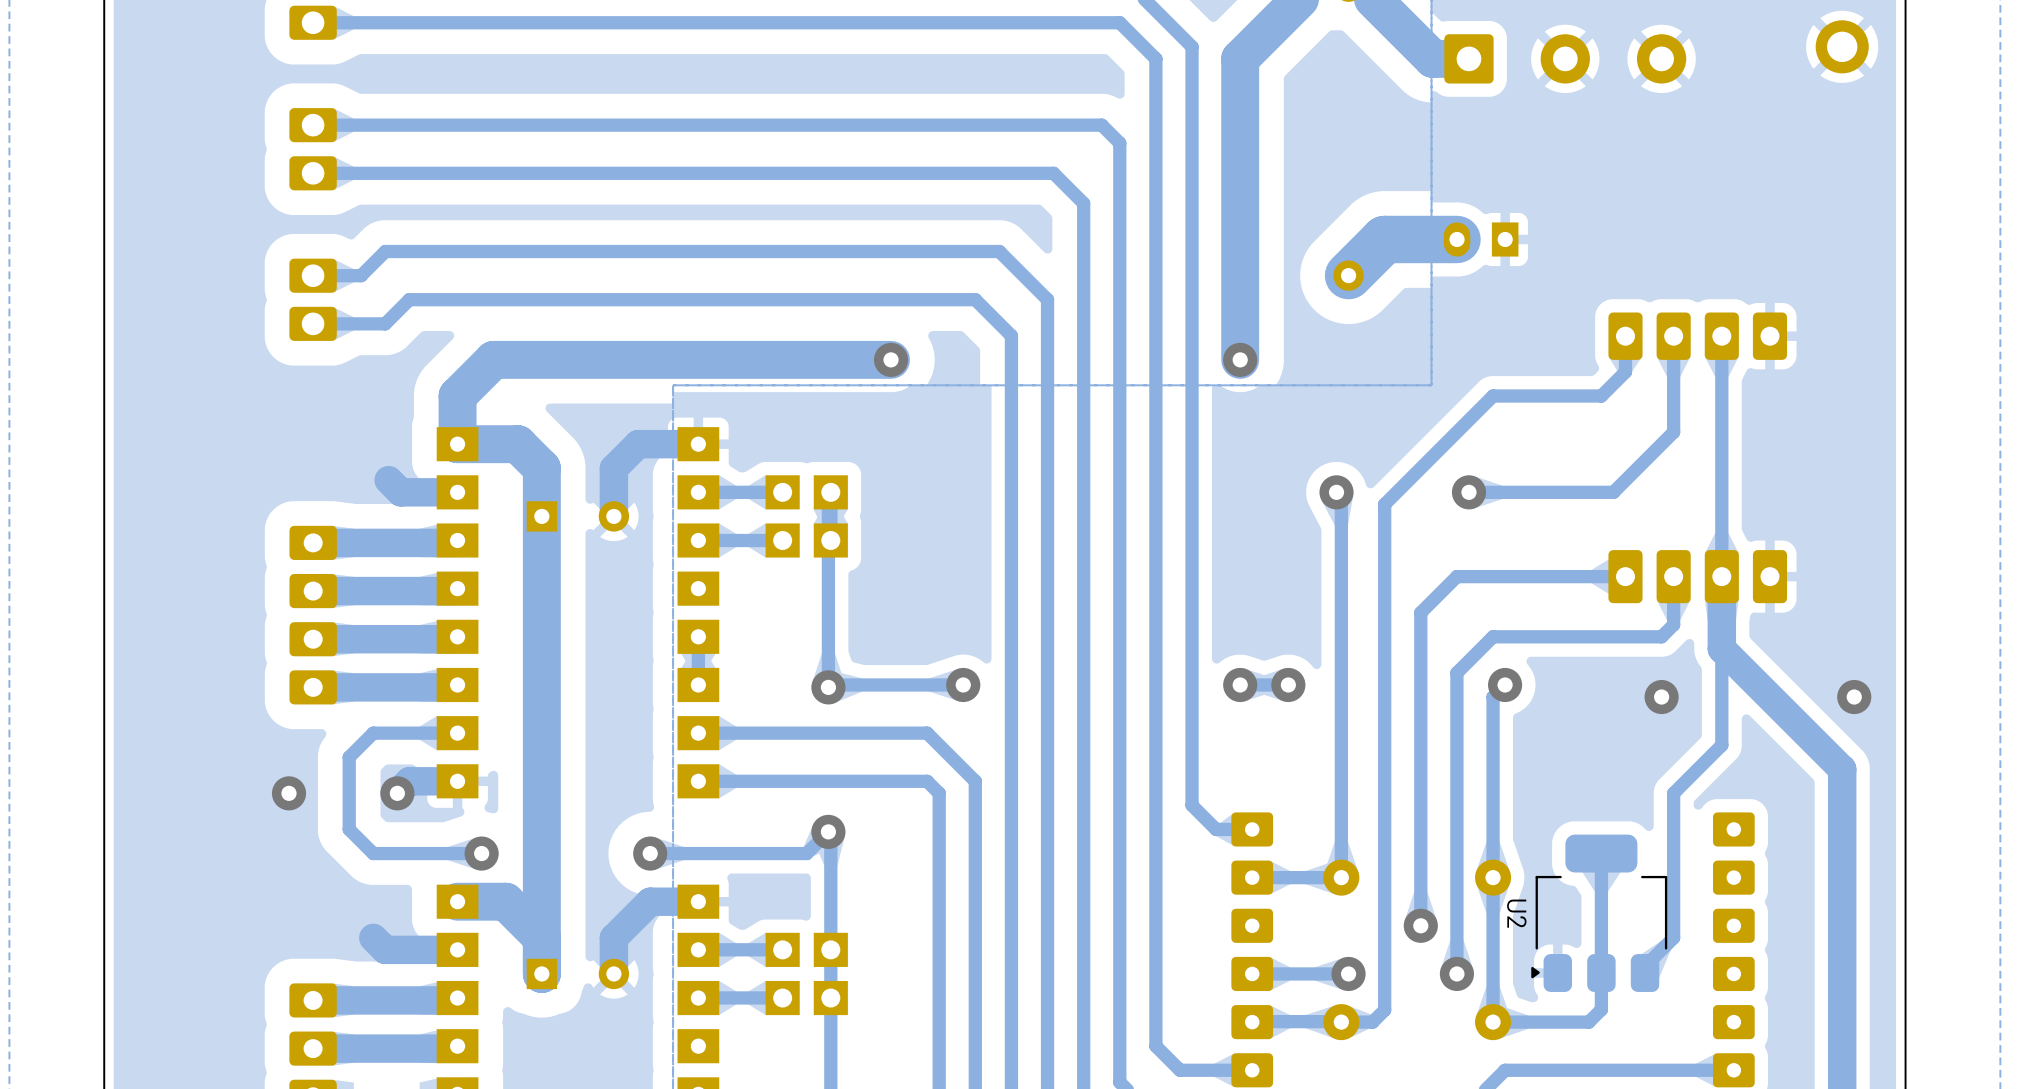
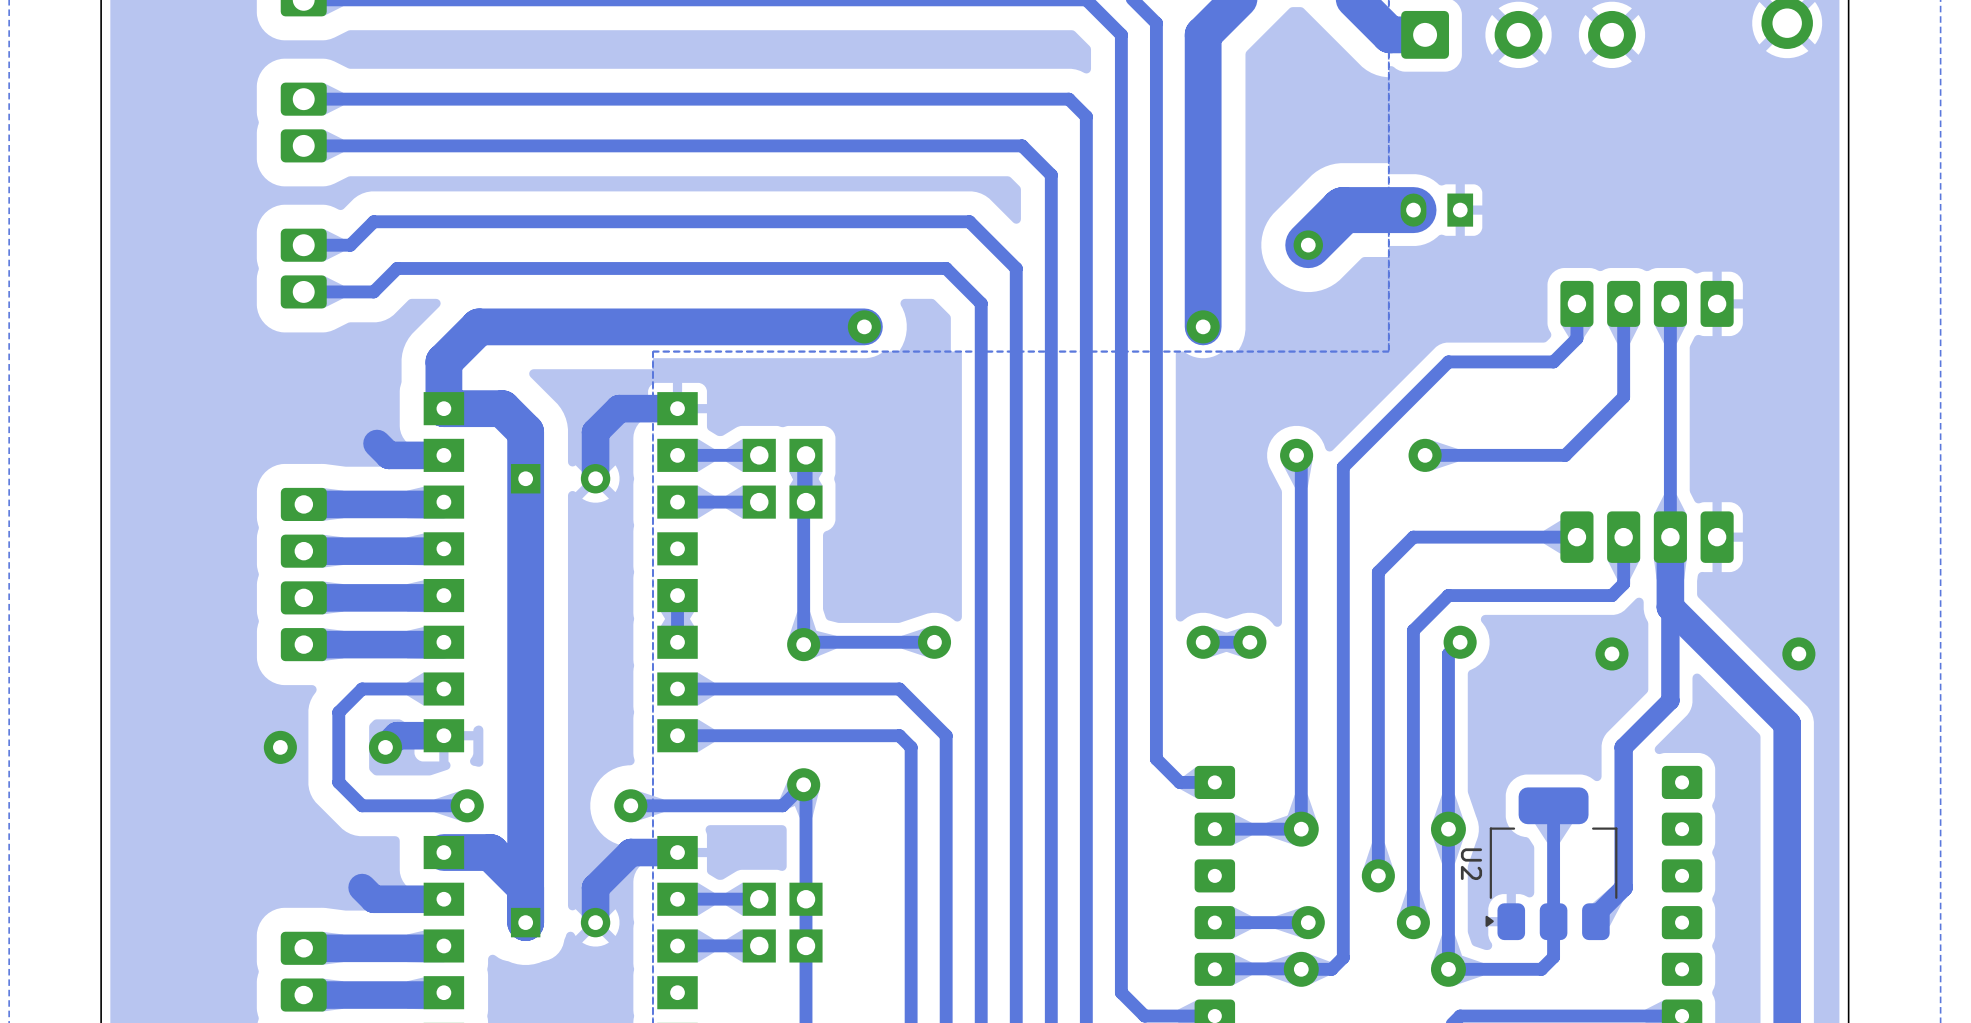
track width: thin (1721, 576) (1721, 745) (1673, 793) (1673, 937) (1645, 966) -> thick (1670, 537) (1670, 700) (1623, 747) (1623, 887) (1595, 915)

